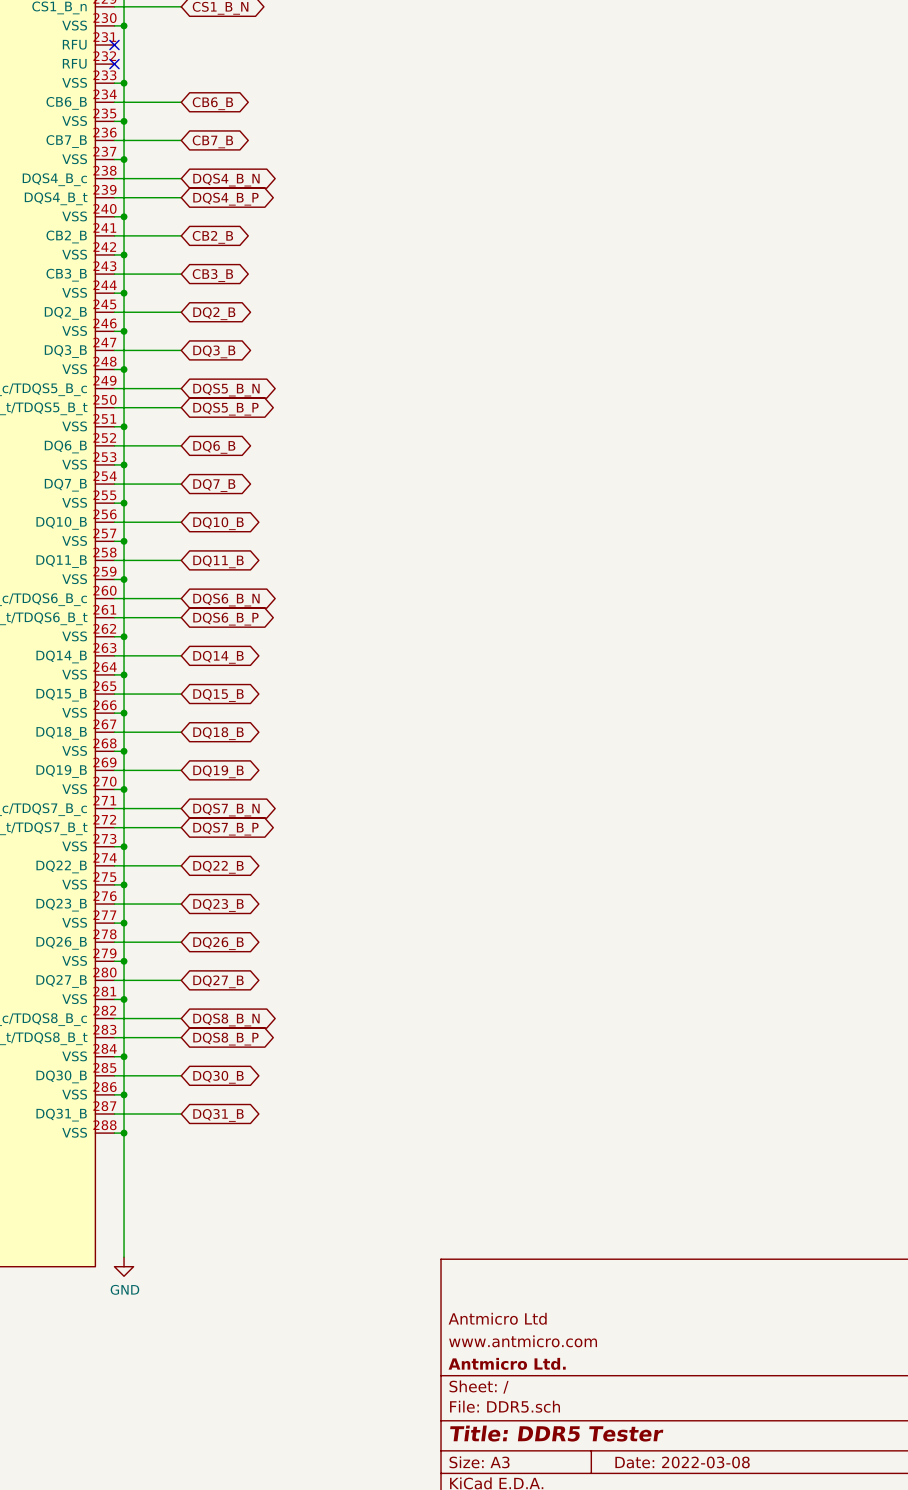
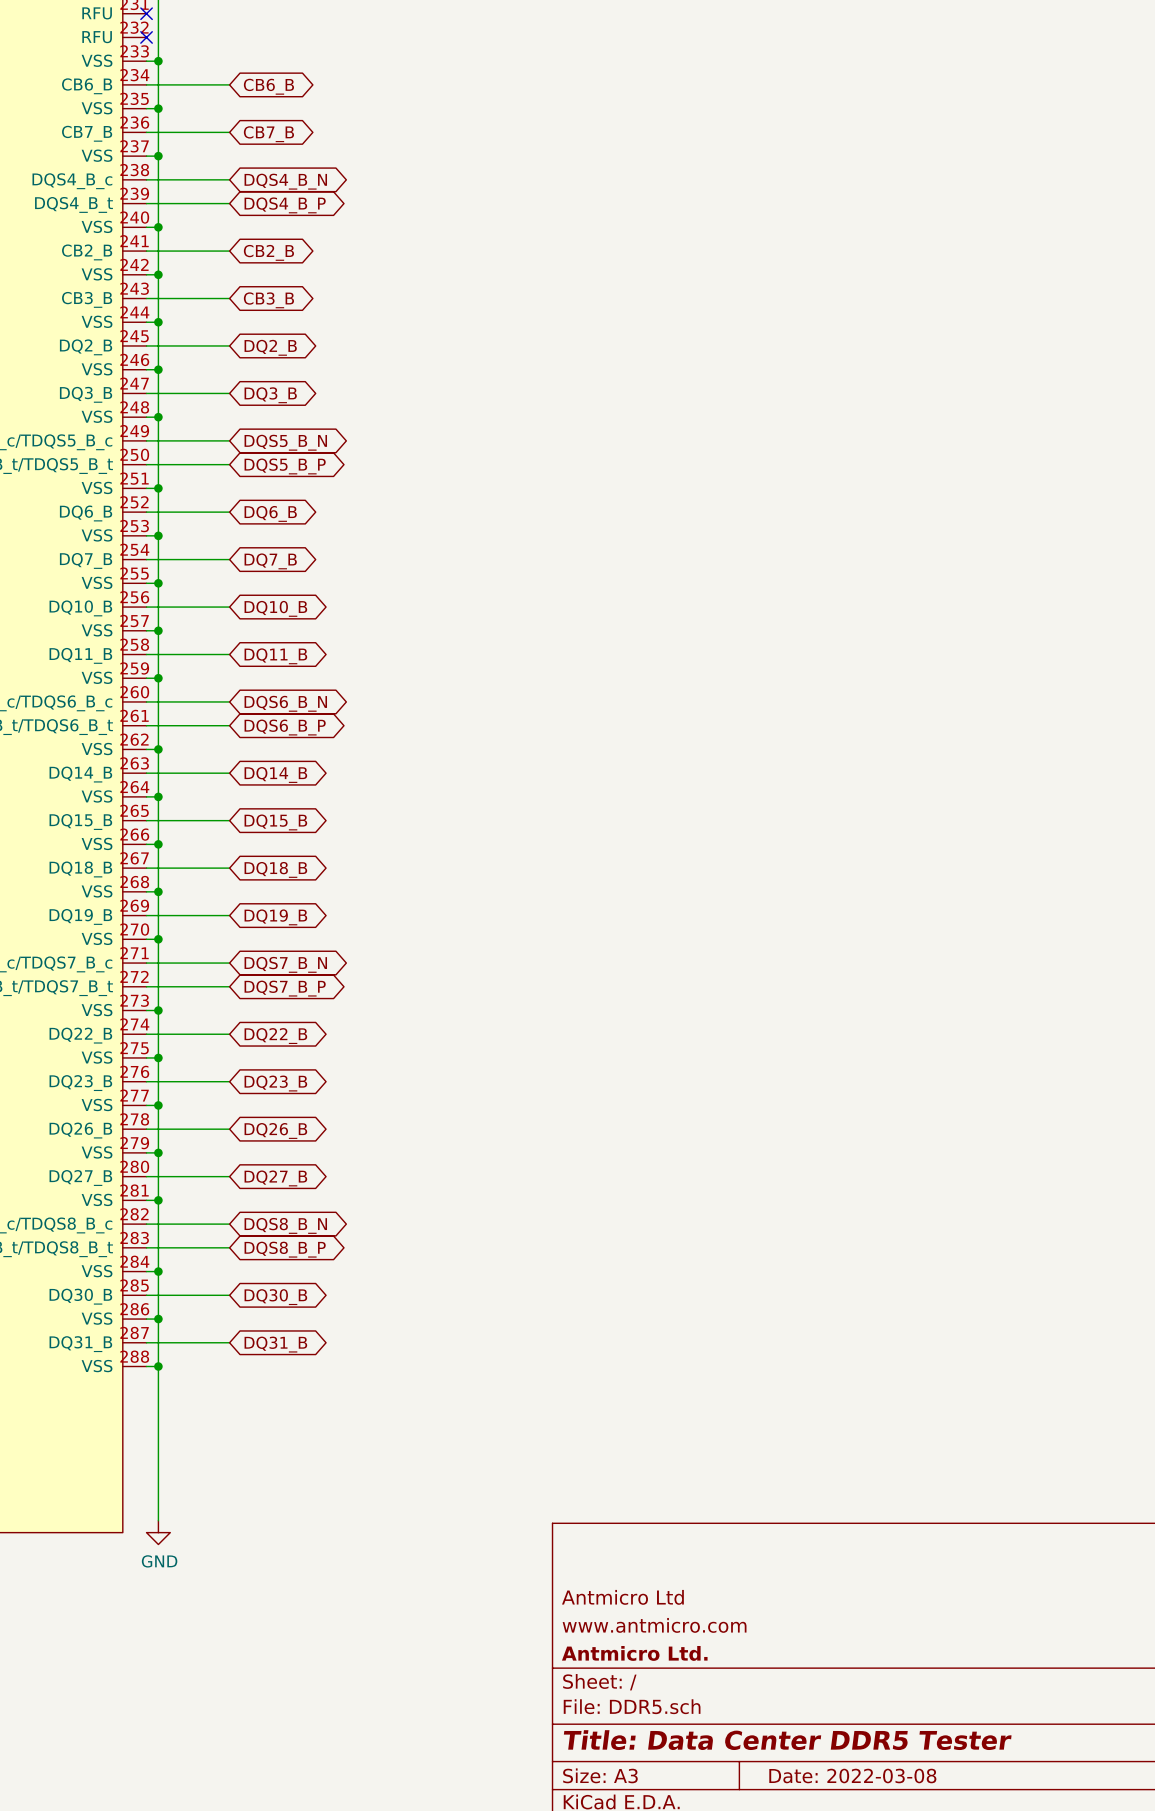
title block: Title: DDR5 Tester (556, 1433) -> Title: Data Center DDR5 Tester (787, 1740)

